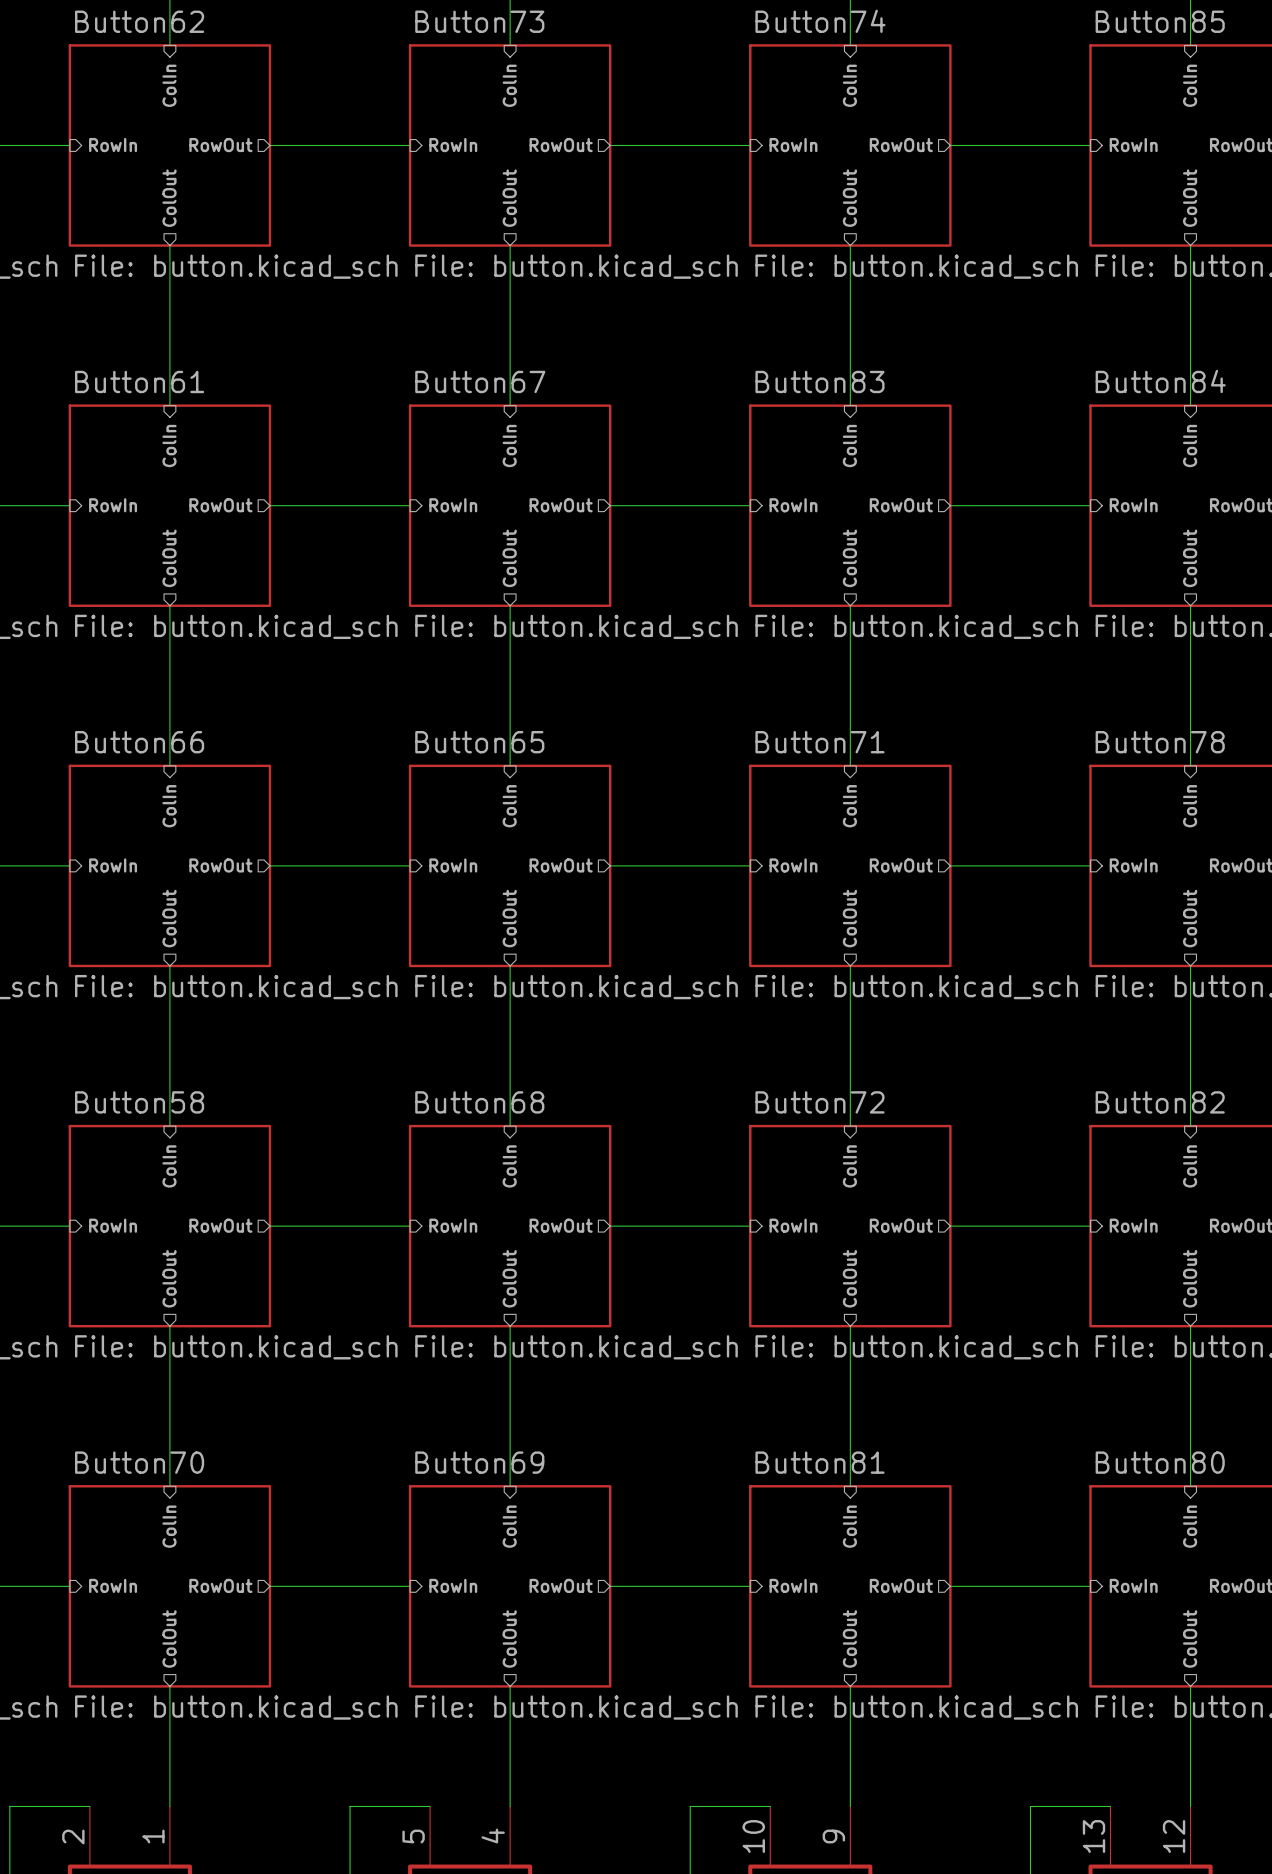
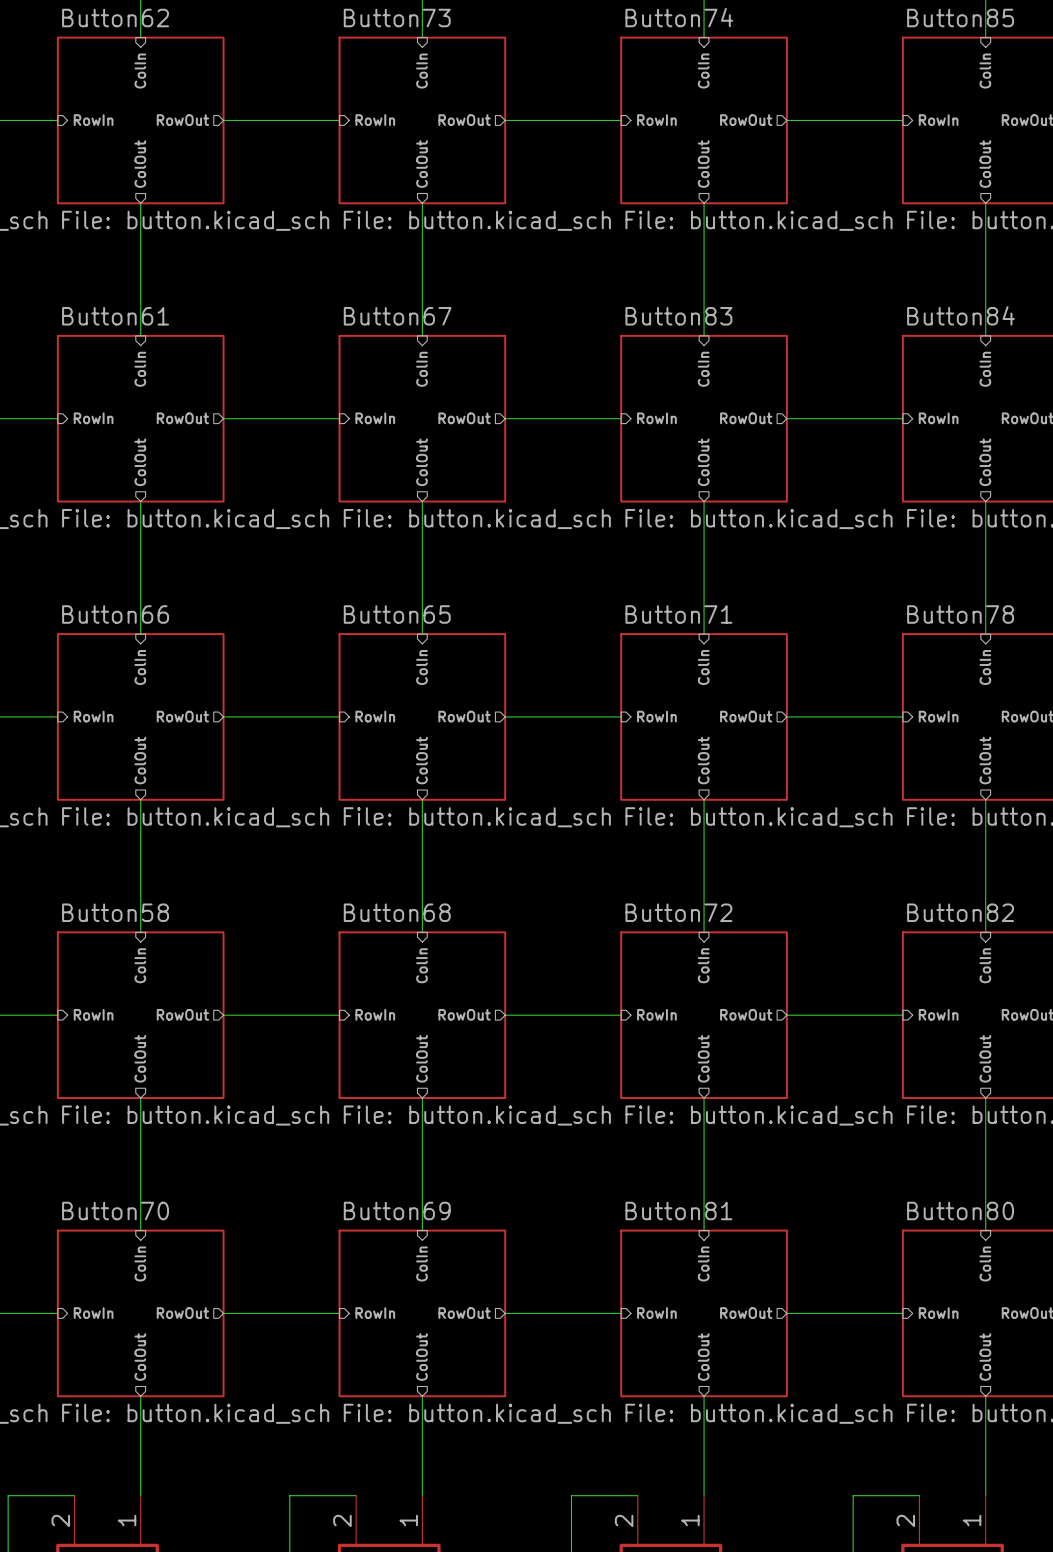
part pin number: 5 (413, 1836) -> 2 (342, 1520)
part pin number: 4 (493, 1836) -> 1 (408, 1520)
part pin number: 10 (753, 1836) -> 2 (624, 1520)
part pin number: 9 (833, 1836) -> 1 (690, 1520)
part pin number: 13 (1093, 1836) -> 2 (905, 1520)
part pin number: 12 (1174, 1836) -> 1 (972, 1520)

